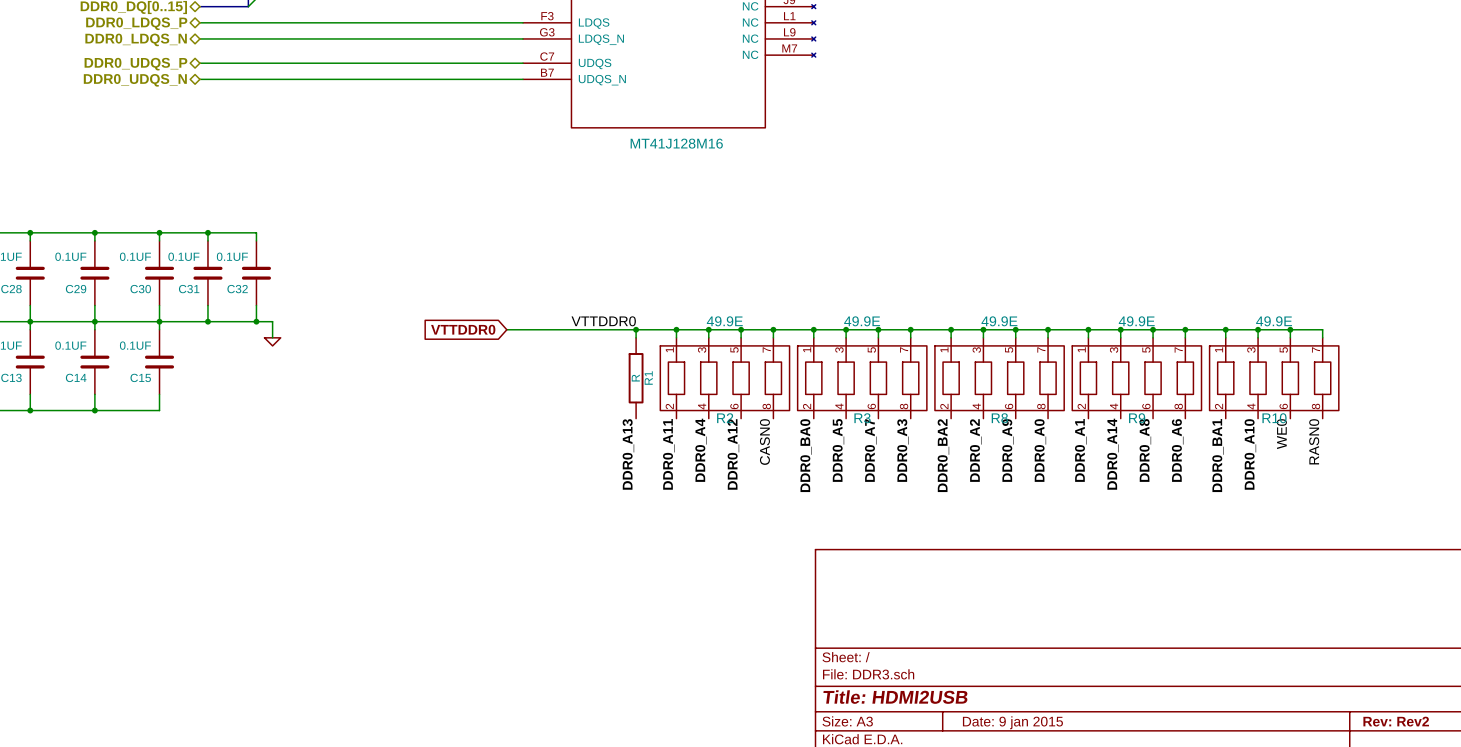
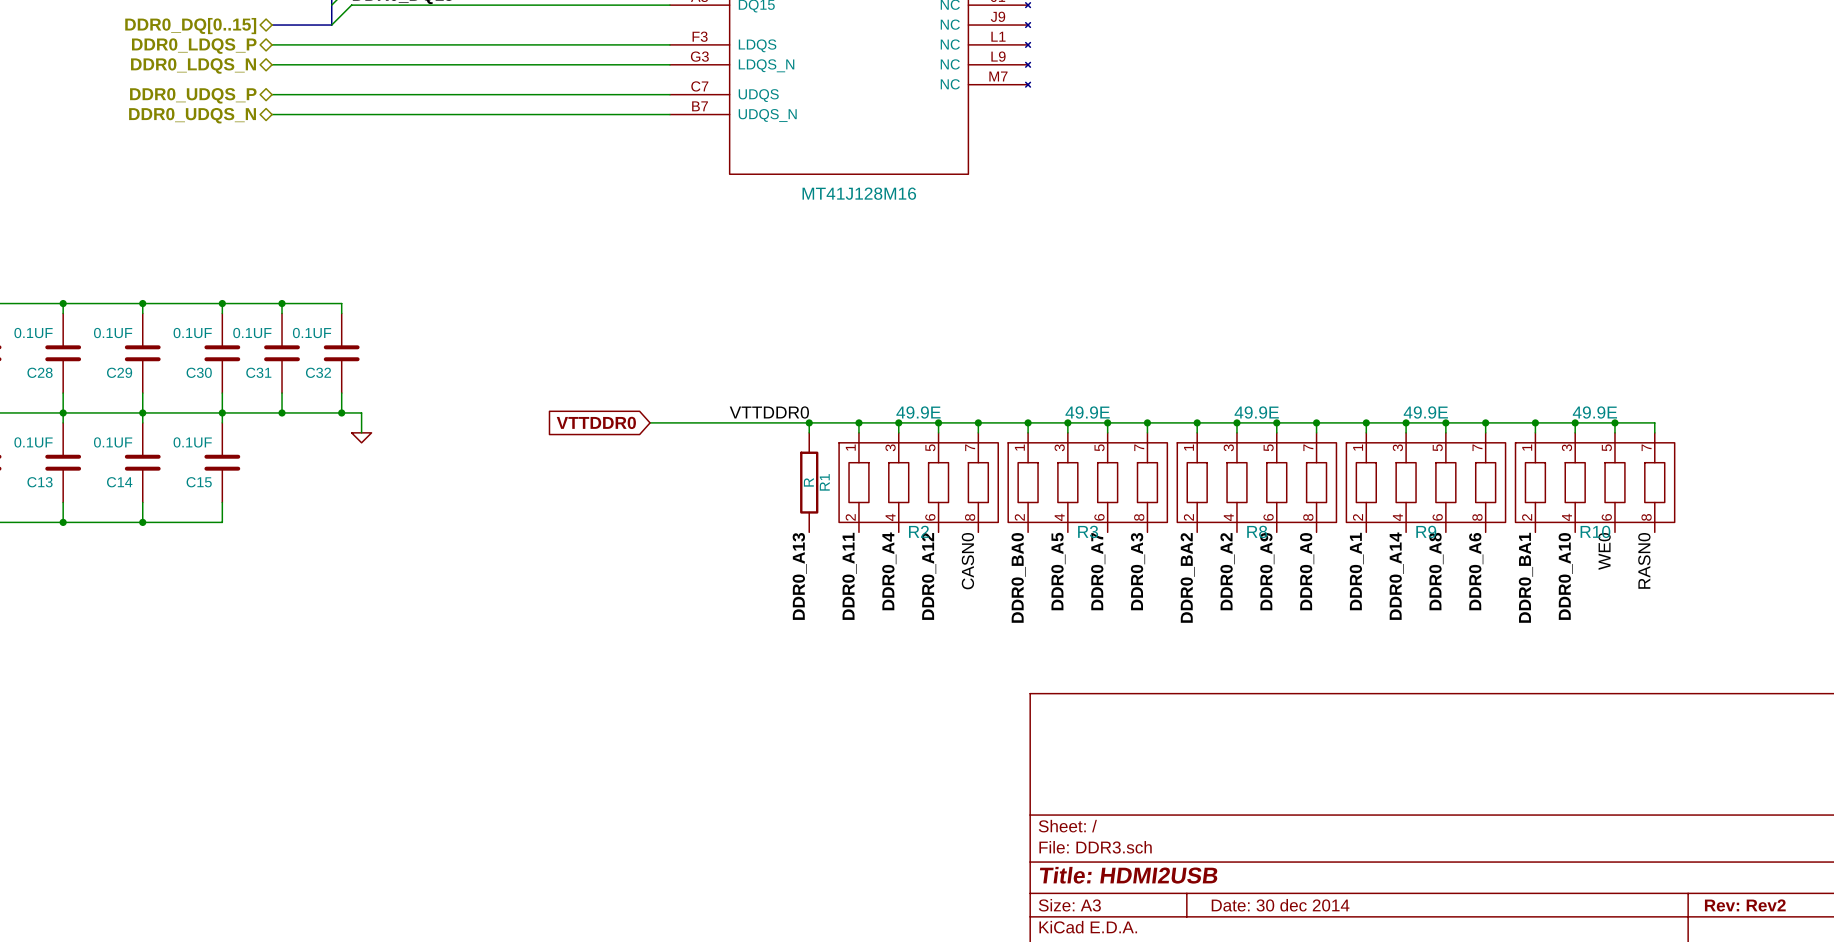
title block: Date: 9 jan 2015 (1012, 722) -> Date: 30 dec 2014 (1280, 905)

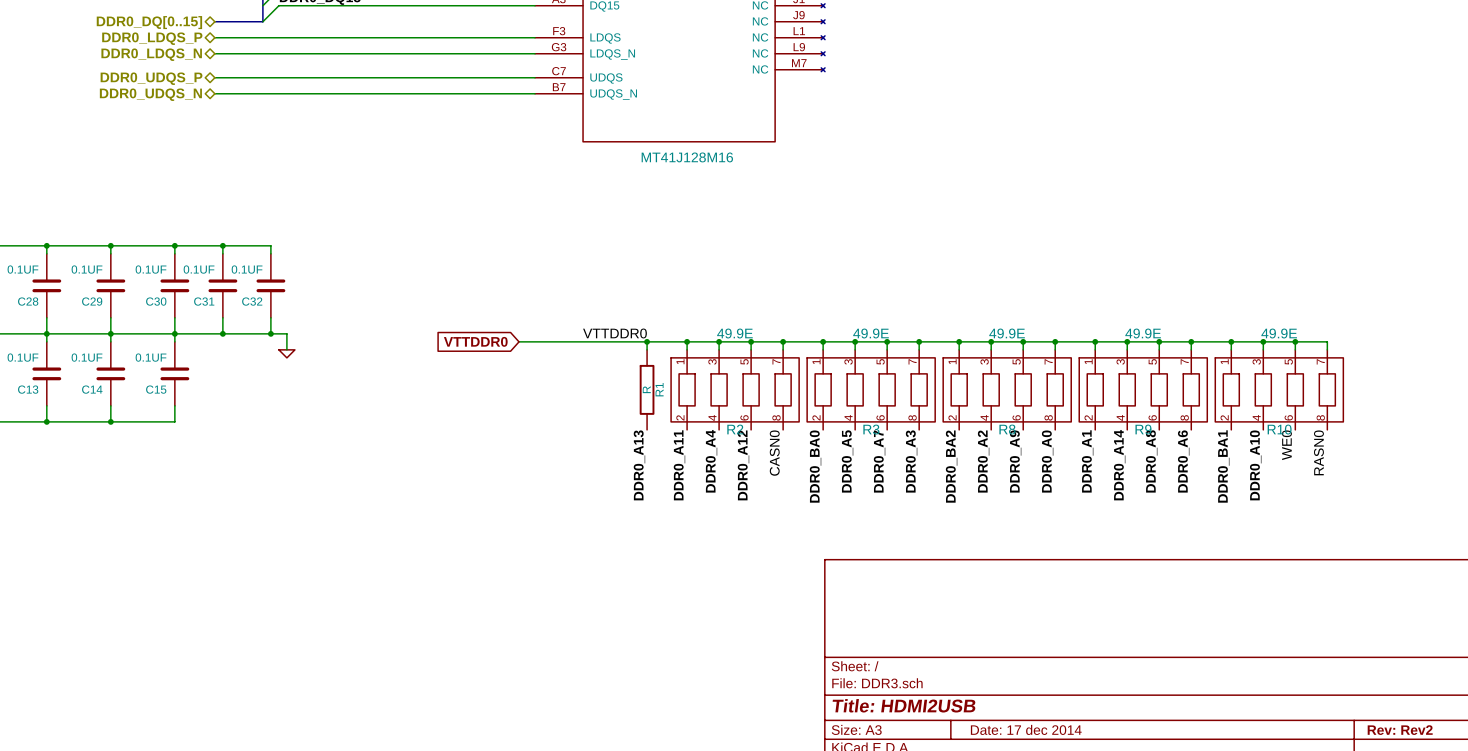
title block: Date: 30 dec 2014 (1280, 905) -> Date: 17 dec 2014 (1026, 729)

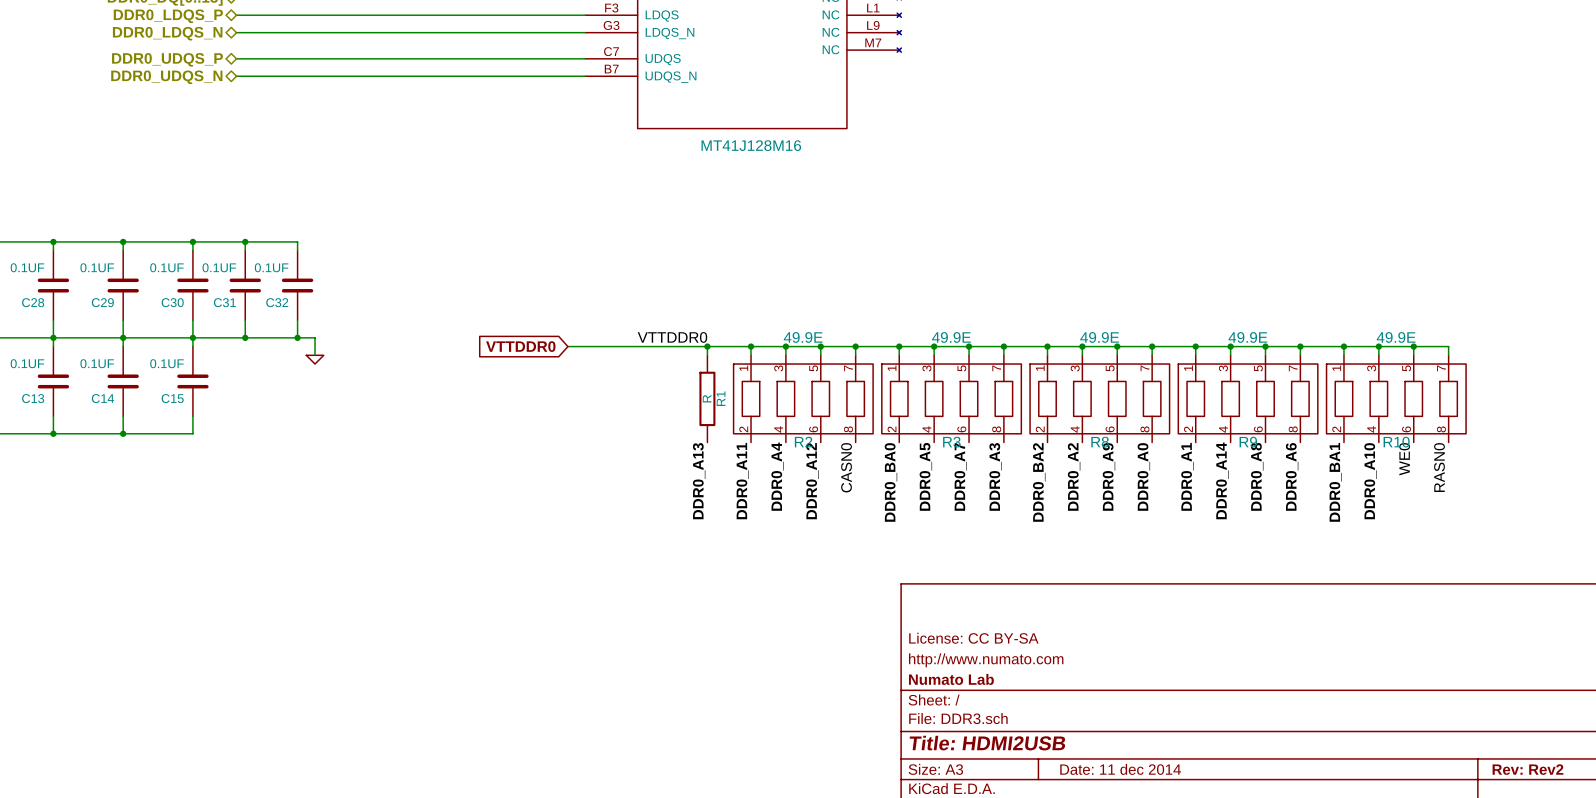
title block: none -> License: CC BY-SA (973, 638)
title block: none -> http://www.numato.com (986, 660)
title block: none -> Numato Lab (951, 679)
title block: Date: 17 dec 2014 (1026, 729) -> Date: 11 dec 2014 (1120, 769)

